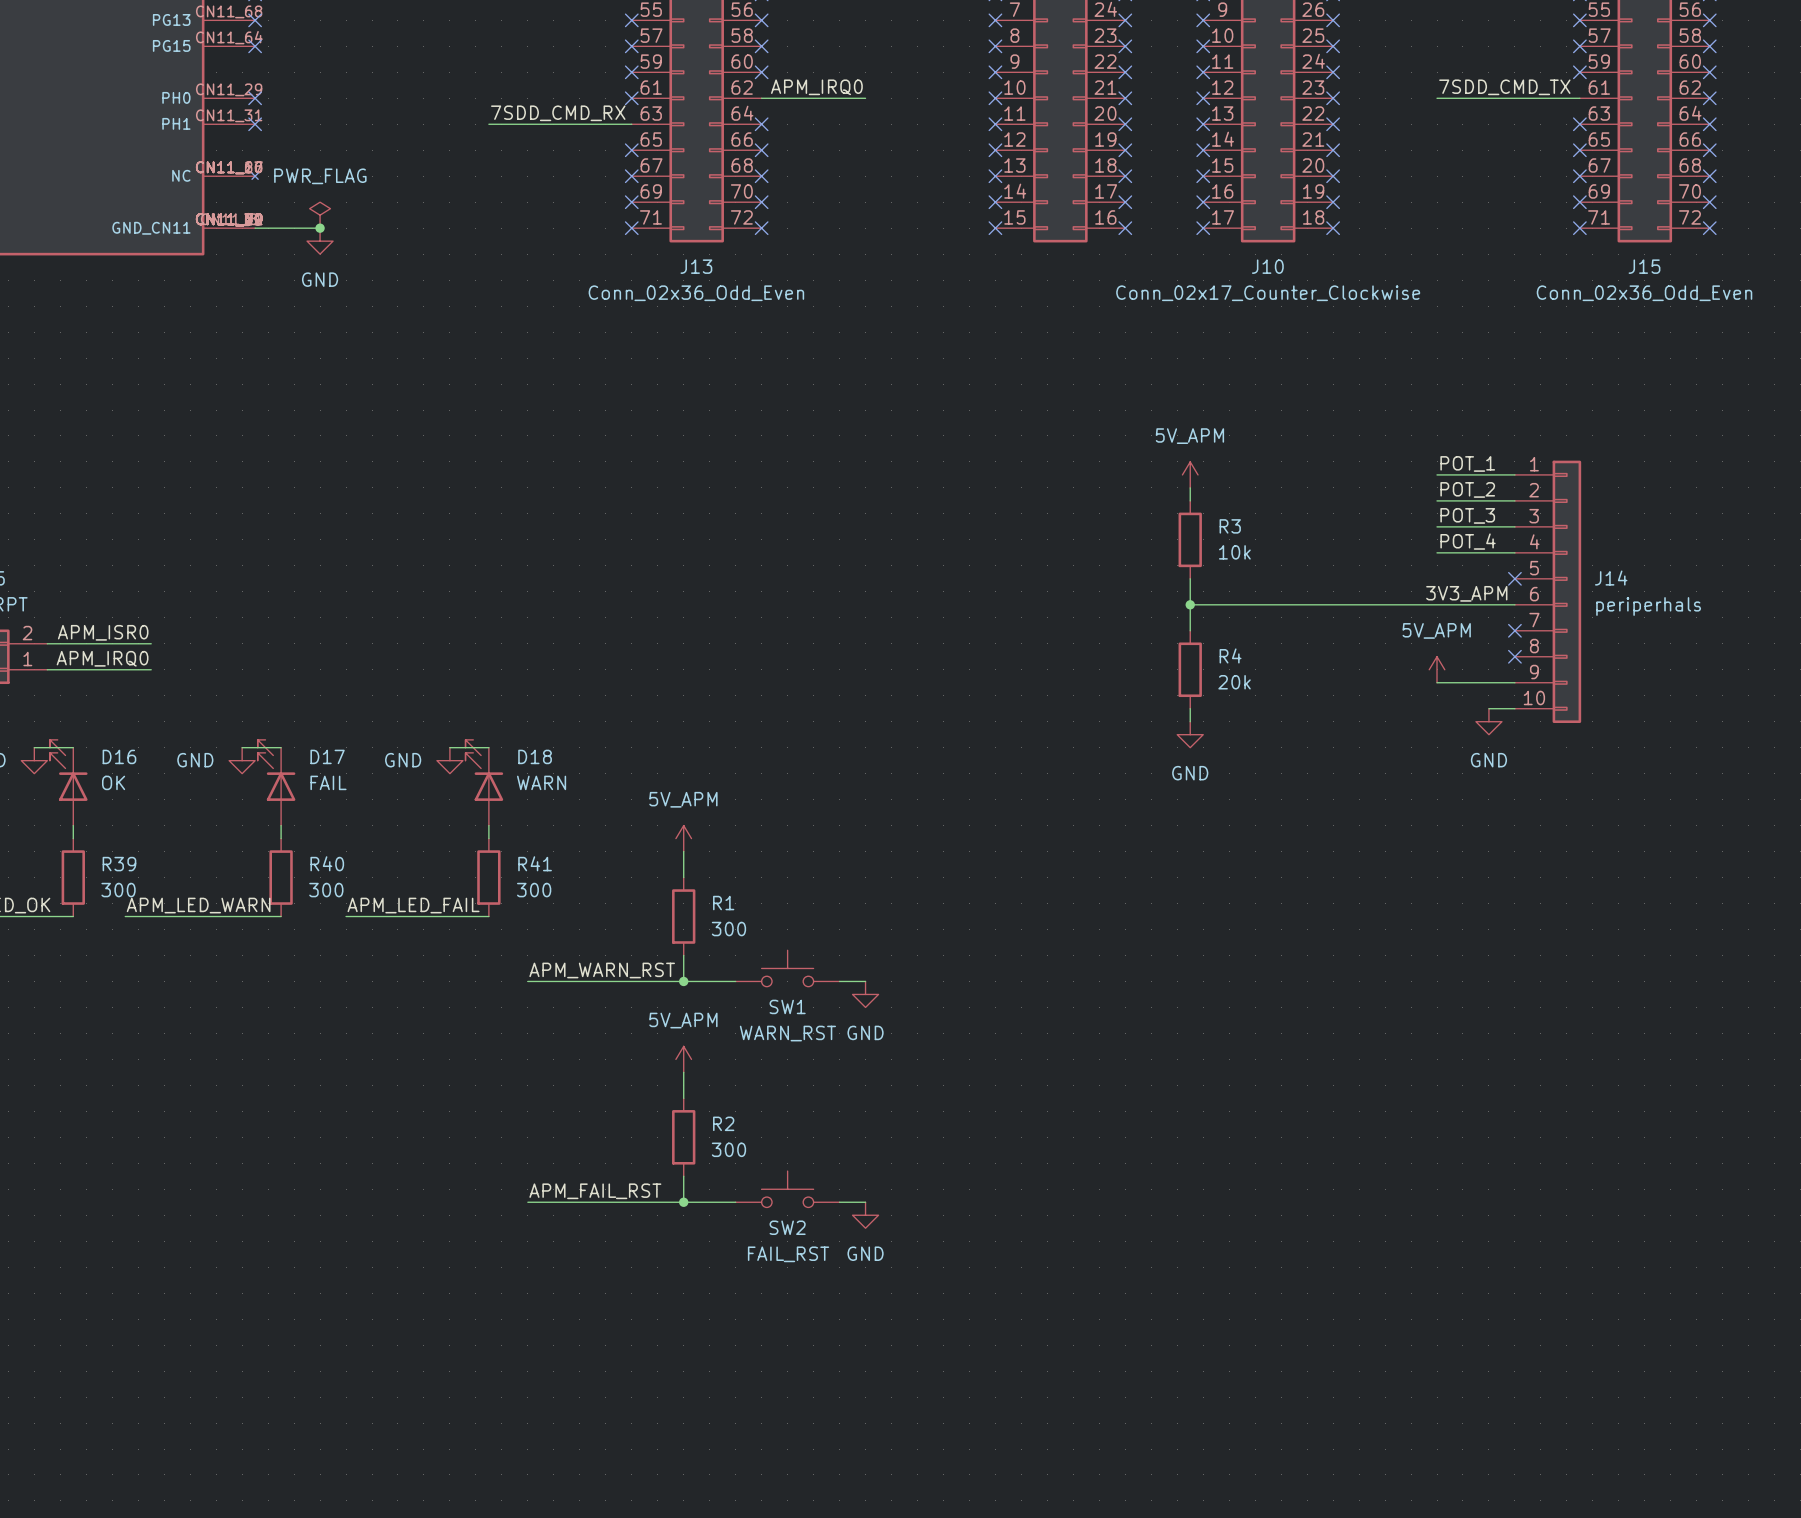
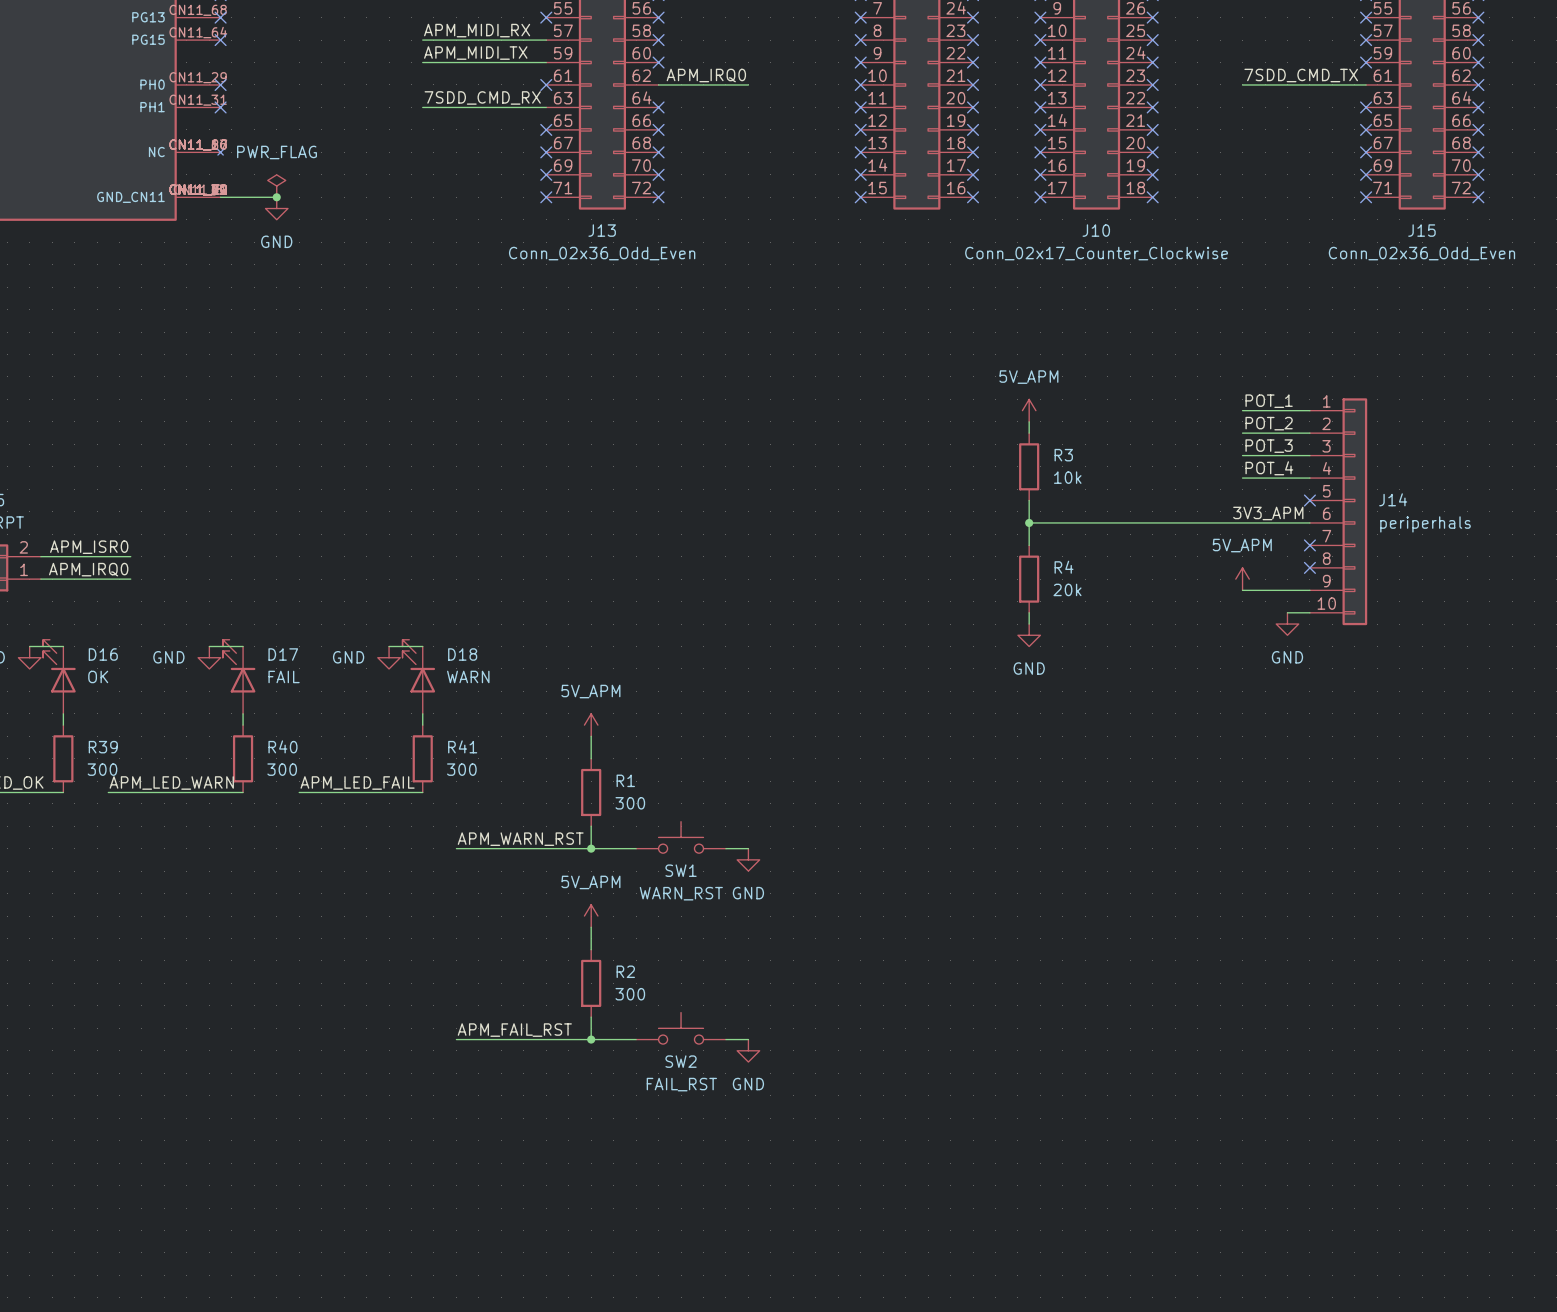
label: none -> APM_MIDI_RX (477, 30)
wire: none -> (422, 40) (546, 40)
no-connect mark: (631, 46) -> none
label: none -> APM_MIDI_TX (475, 53)
wire: none -> (422, 62) (546, 62)
no-connect mark: (631, 72) -> none

